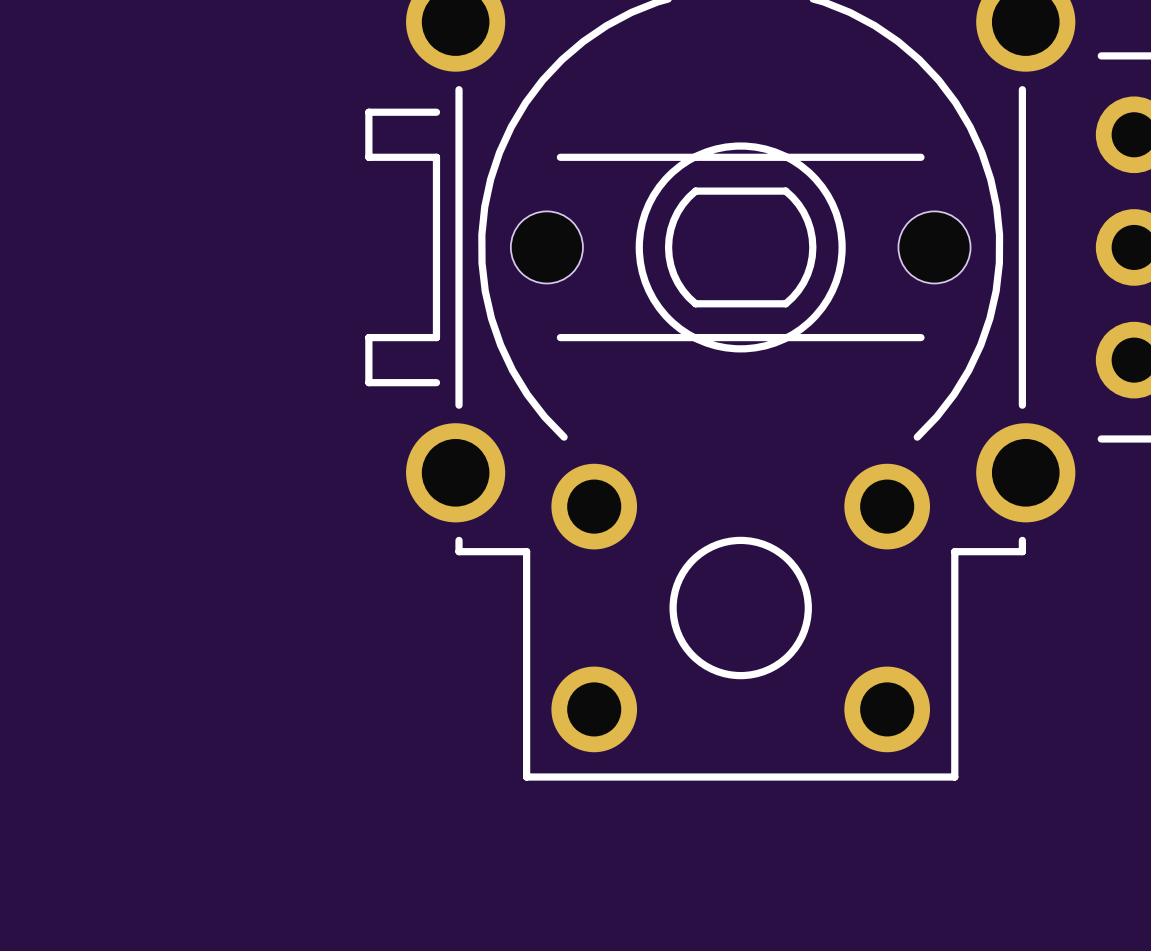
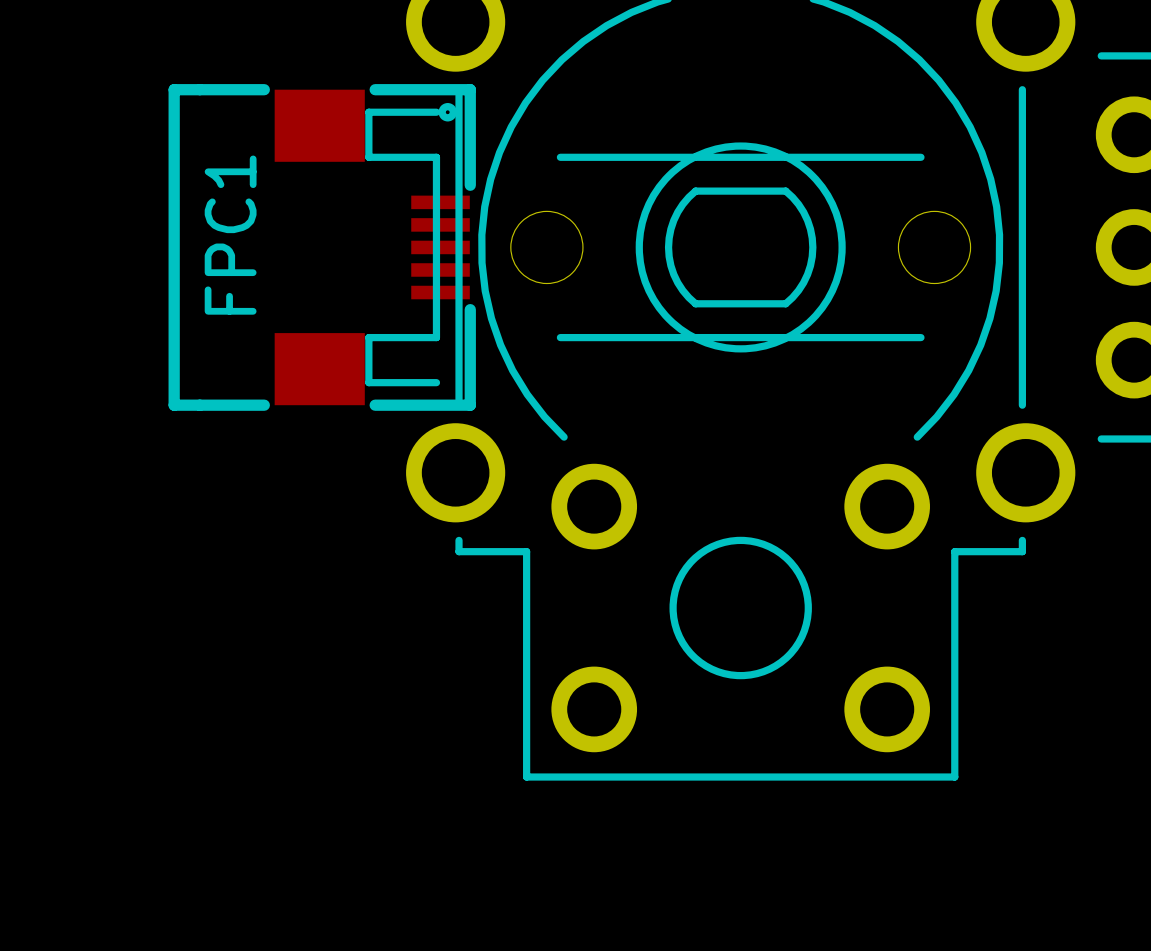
FPC1: none -> (322, 247)

